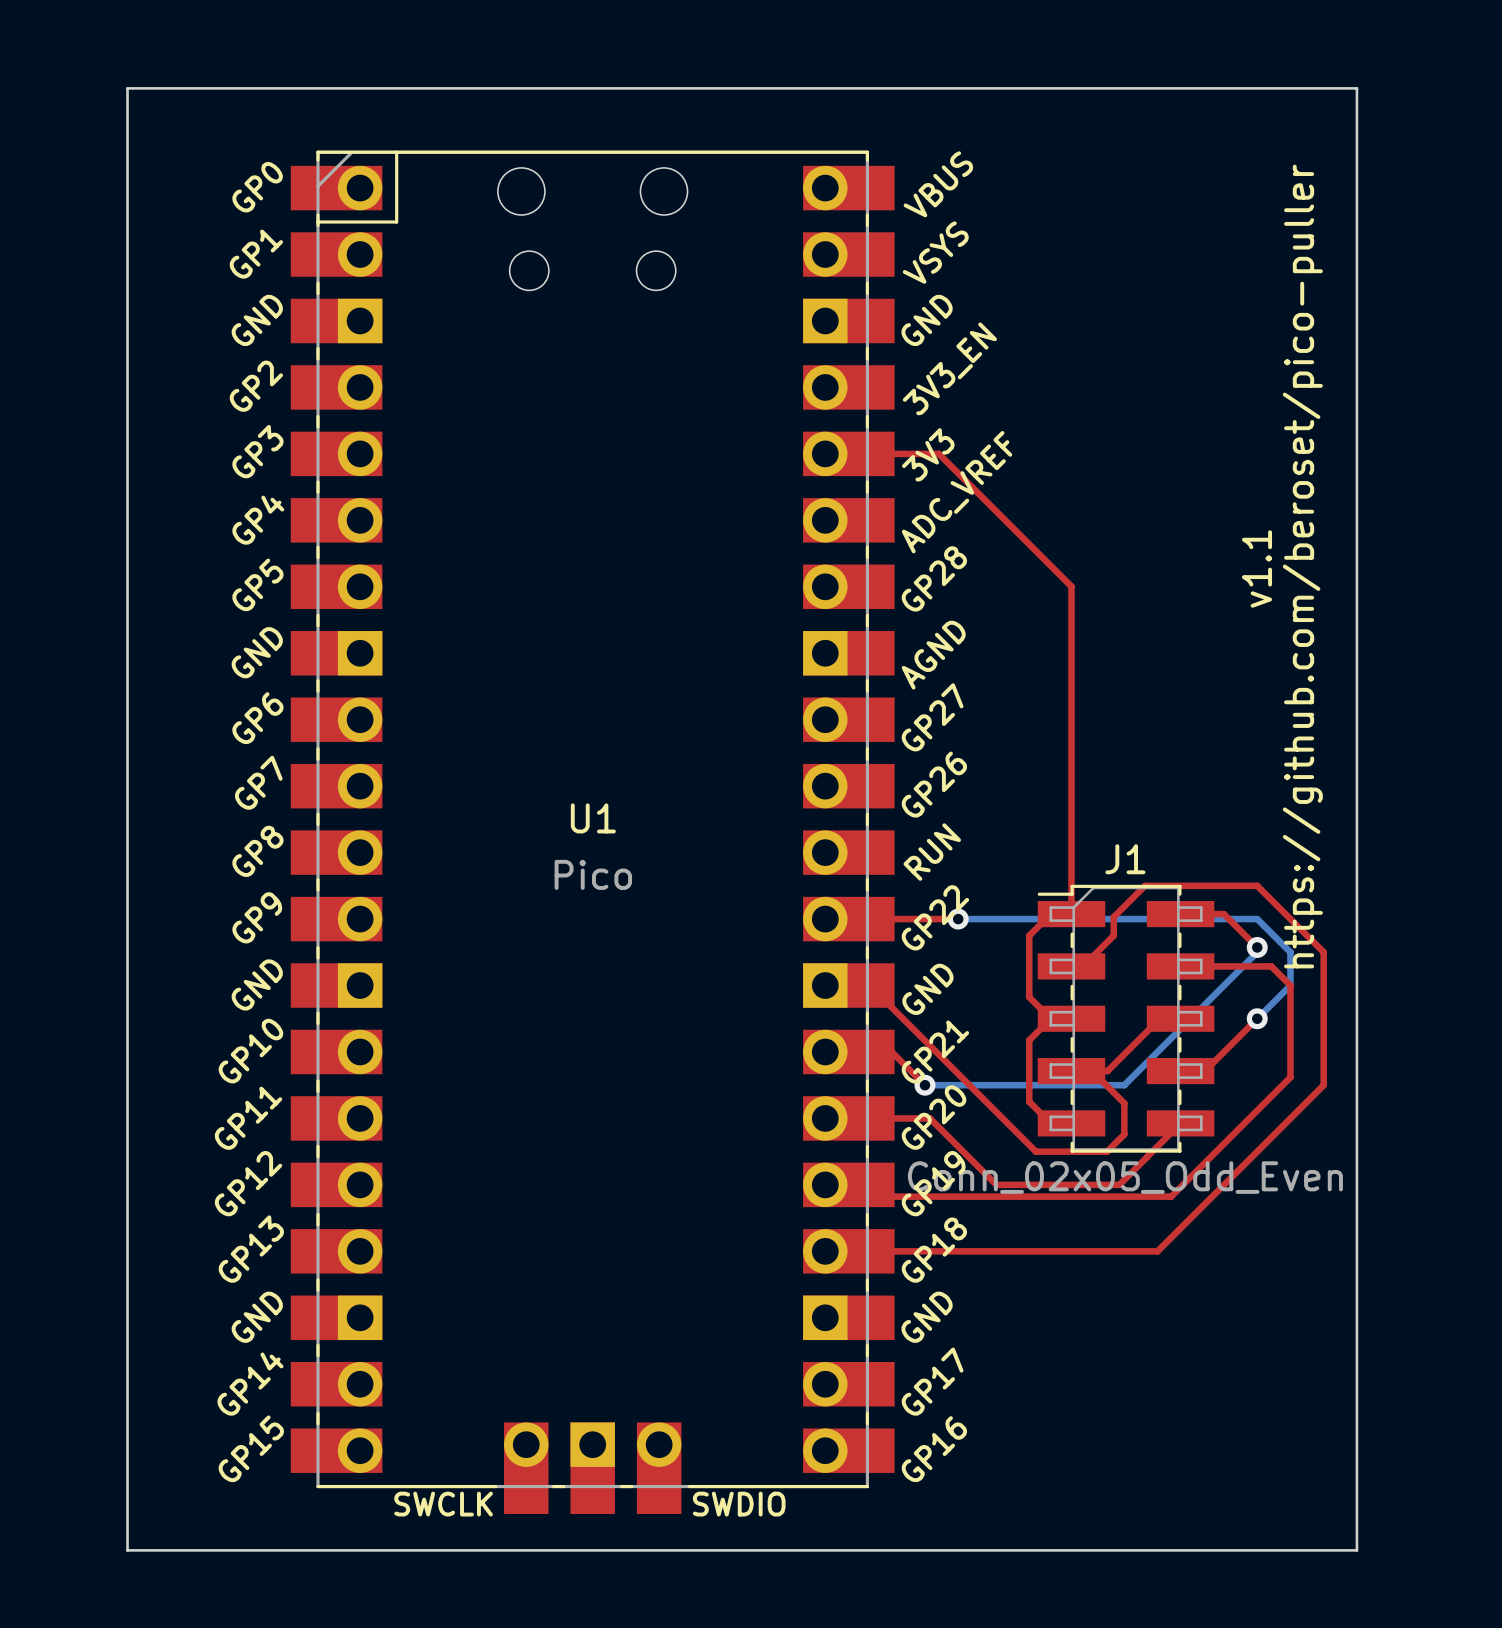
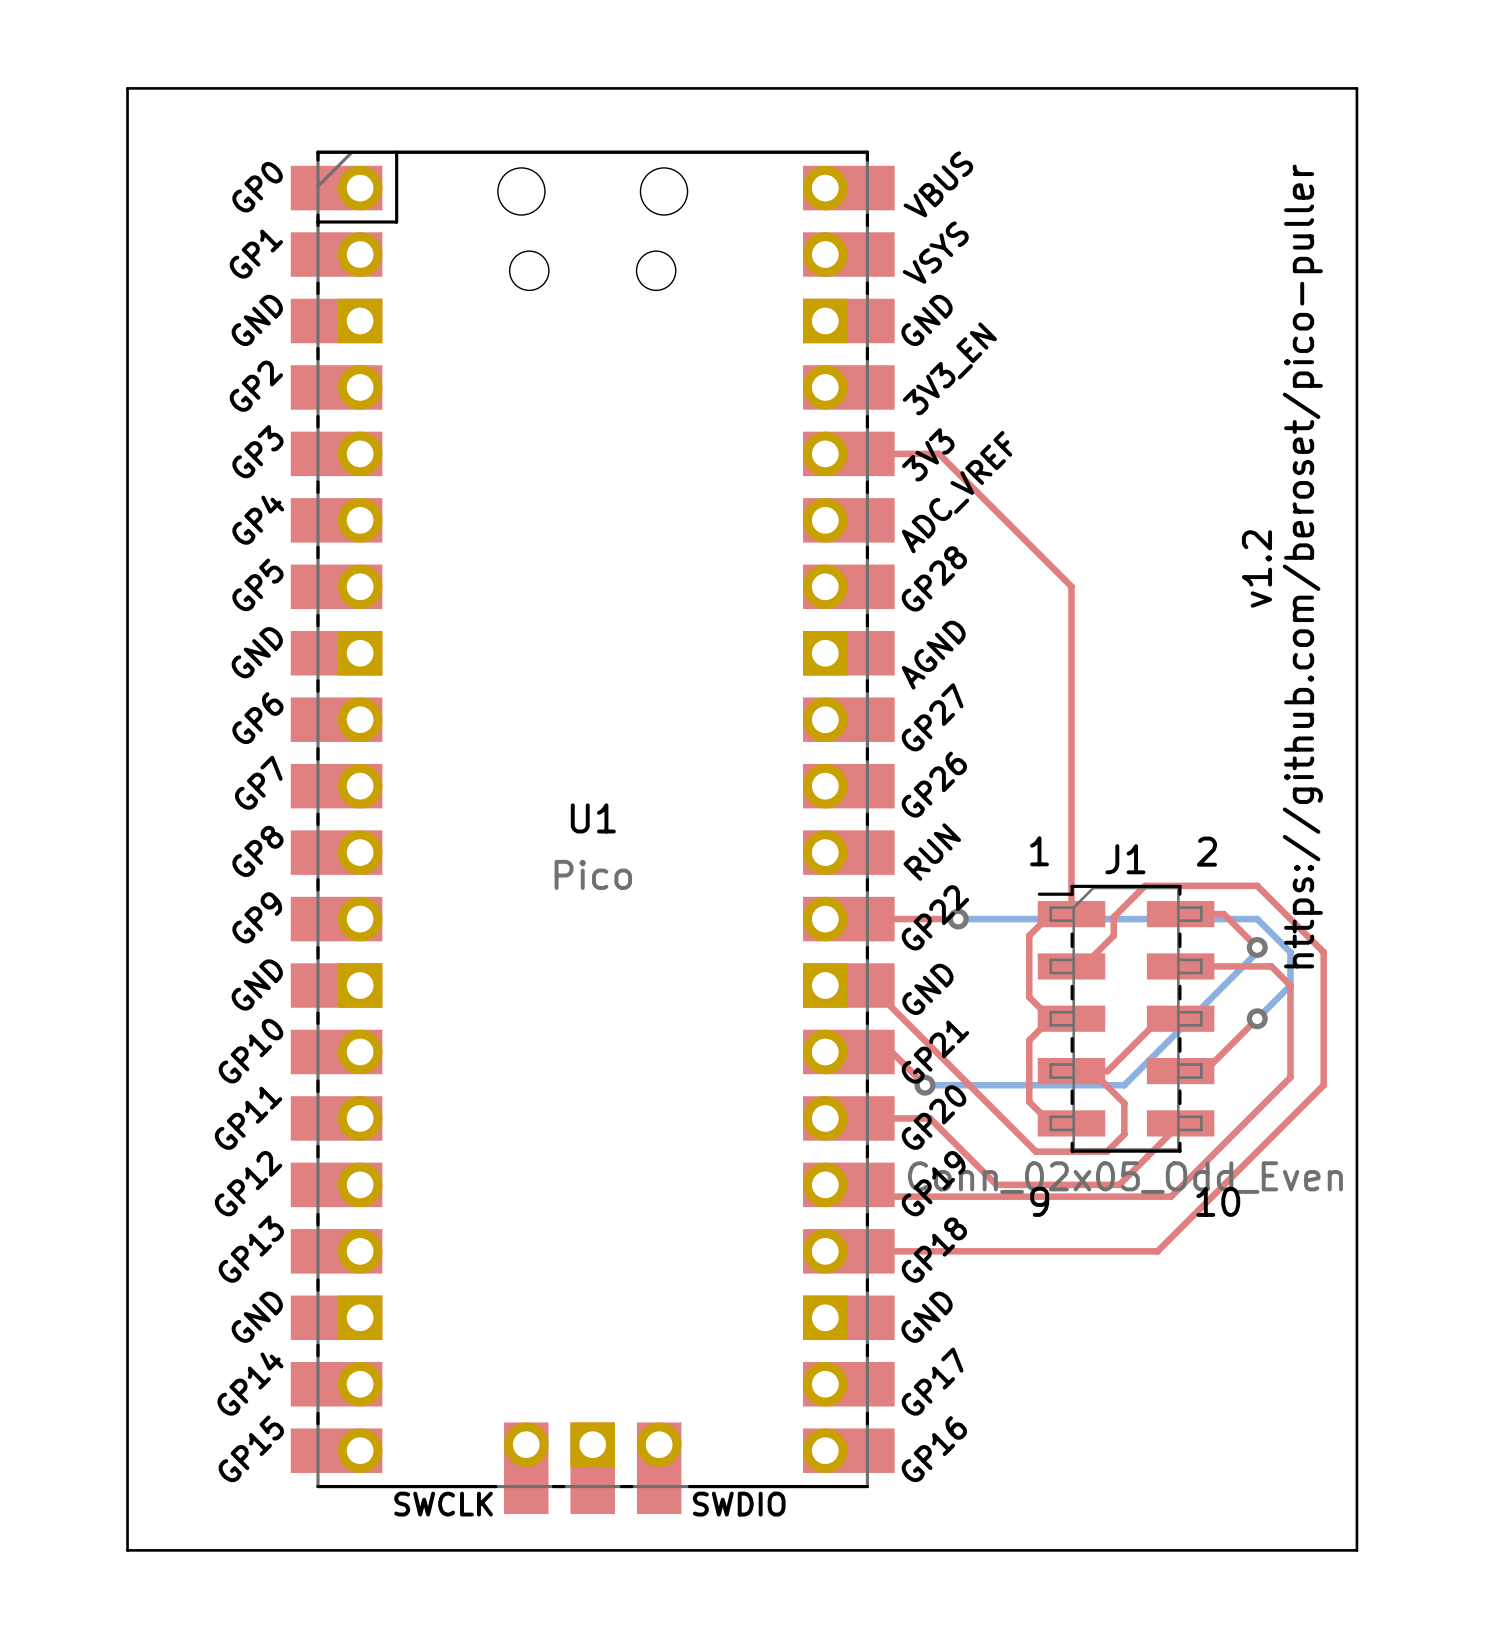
text: v1.1 (1256, 569) -> v1.2 (1256, 569)
text: none -> 1 (1039, 851)
text: none -> 2 (1206, 851)
text: none -> 9 (1039, 1201)
text: none -> 10 (1218, 1201)

